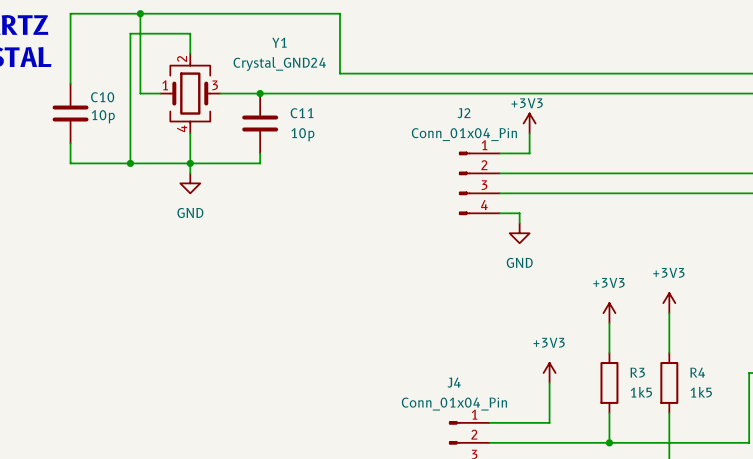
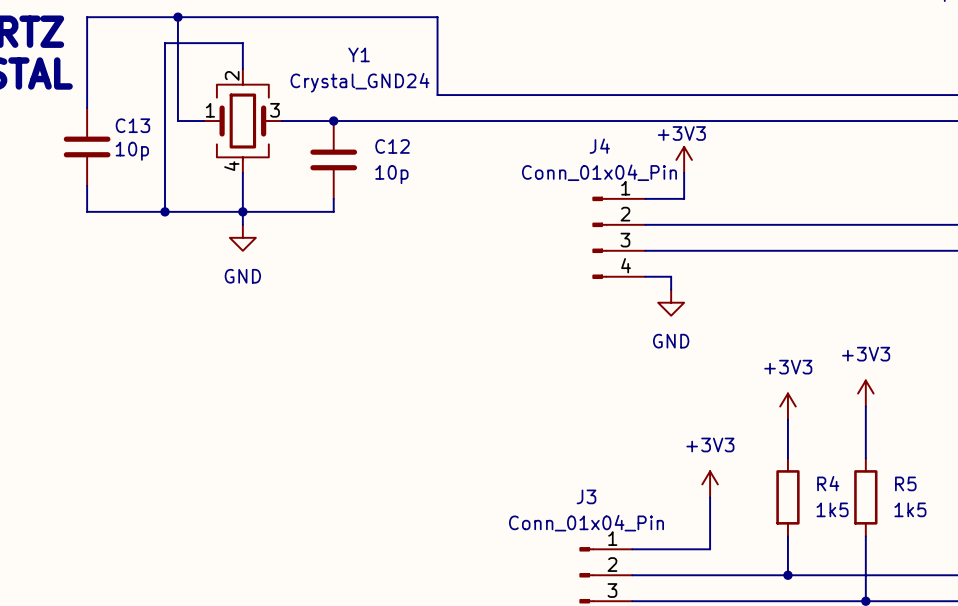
C10 name: C10 (102, 97) -> C13 (132, 125)
C11 name: C11 (302, 113) -> C12 (392, 146)
J2 name: J2 (463, 113) -> J4 (599, 146)
R3 name: R3 (637, 372) -> R4 (828, 483)
R4 name: R4 (697, 372) -> R5 (905, 483)
J4 name: J4 (454, 382) -> J3 (586, 496)

